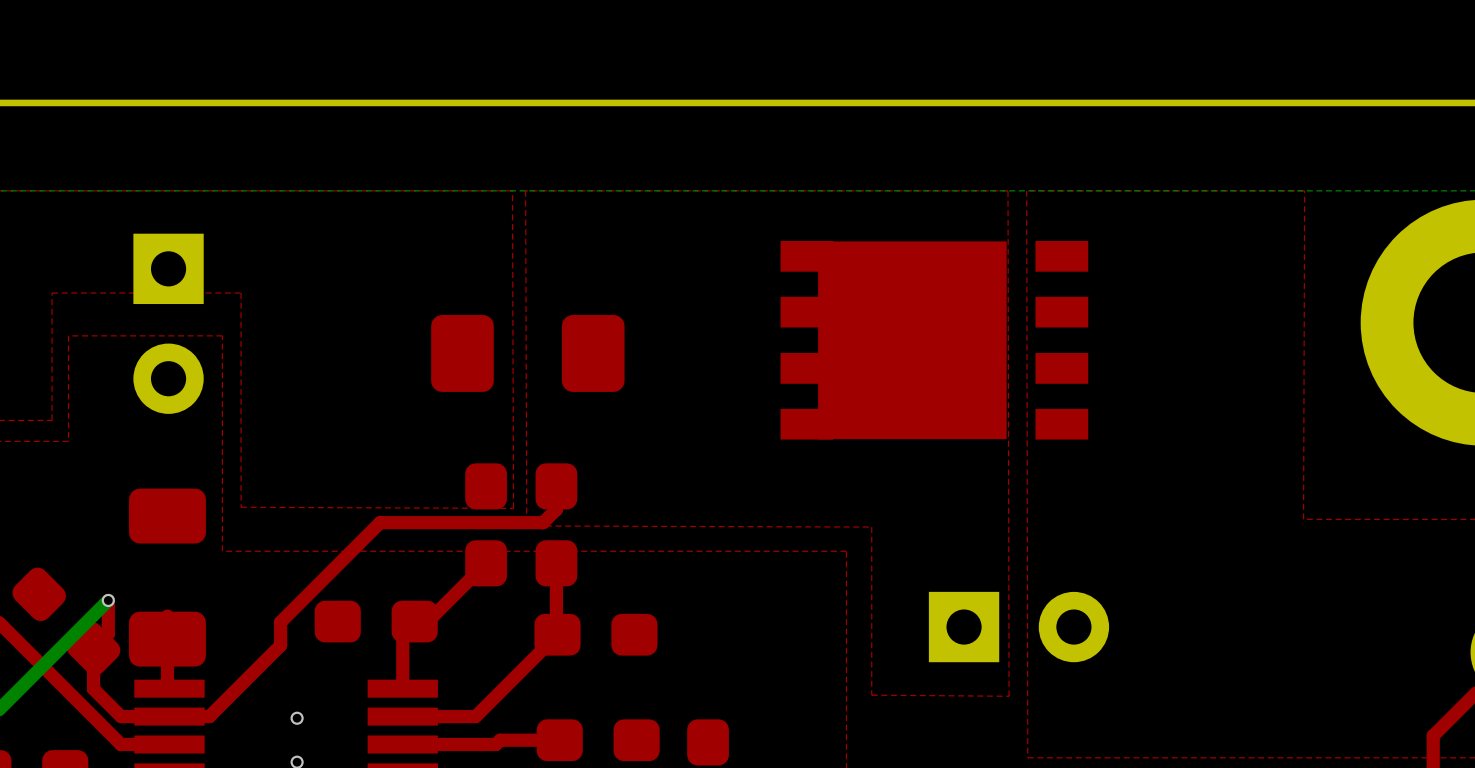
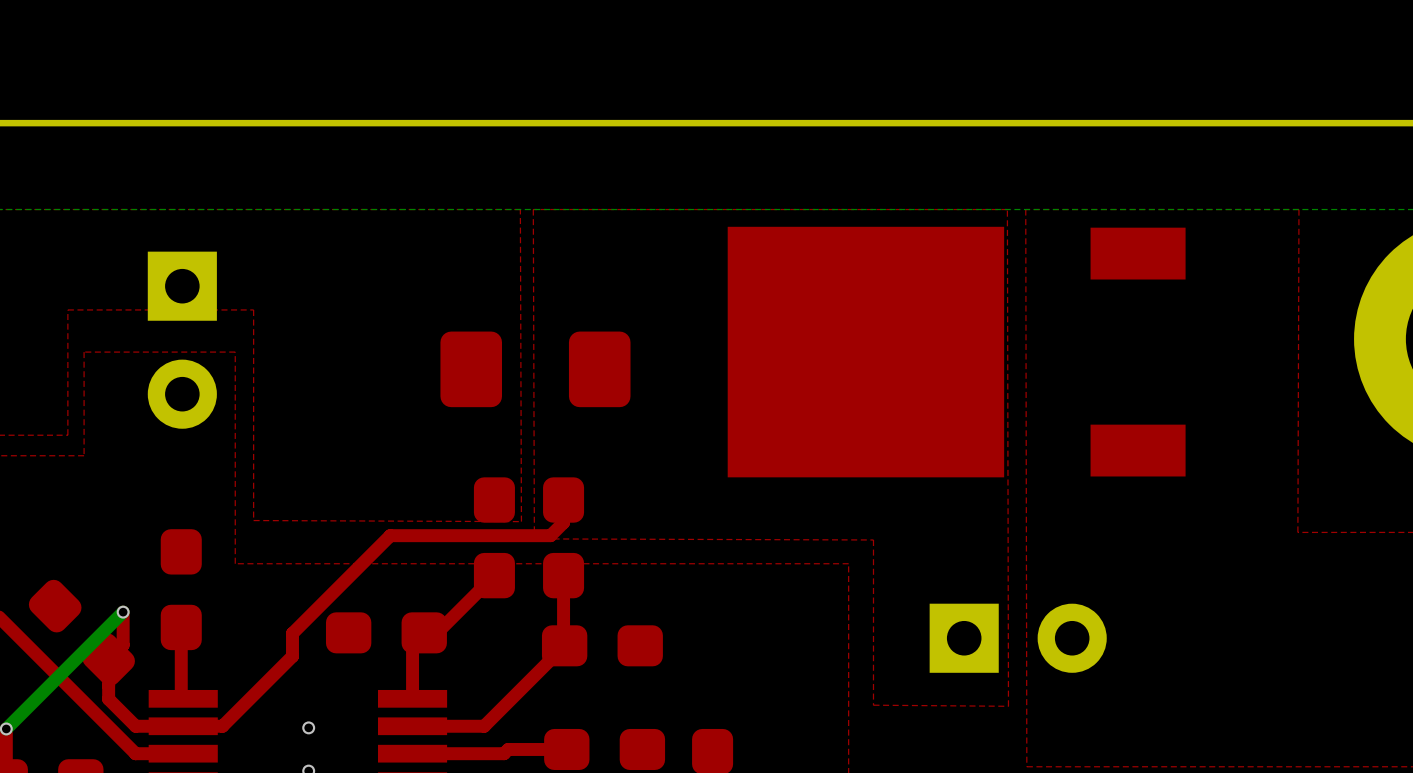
part footprint: [780, 240, 1089, 440] -> [727, 226, 1186, 478]
part footprint: [128, 488, 206, 667] -> [160, 529, 202, 651]

